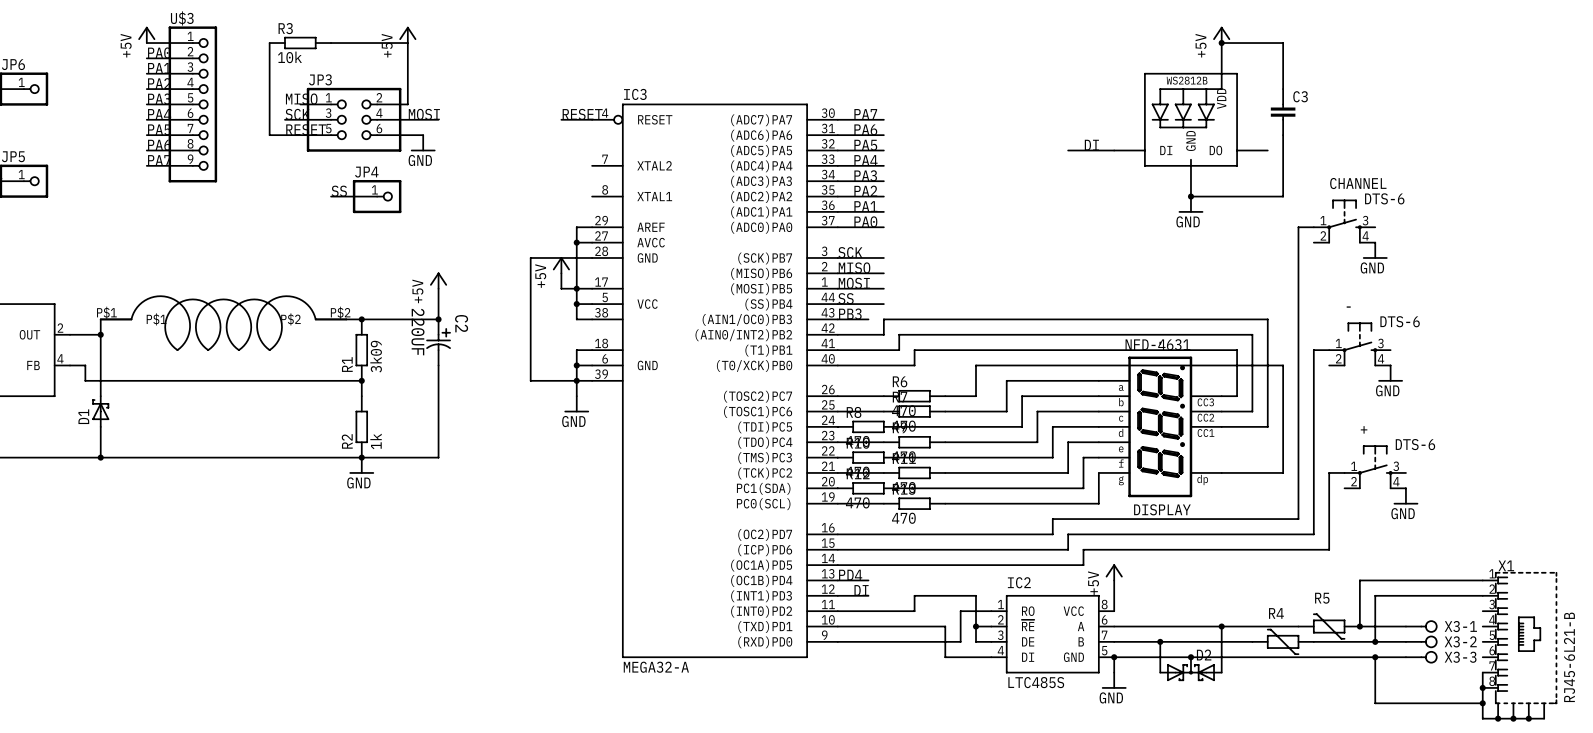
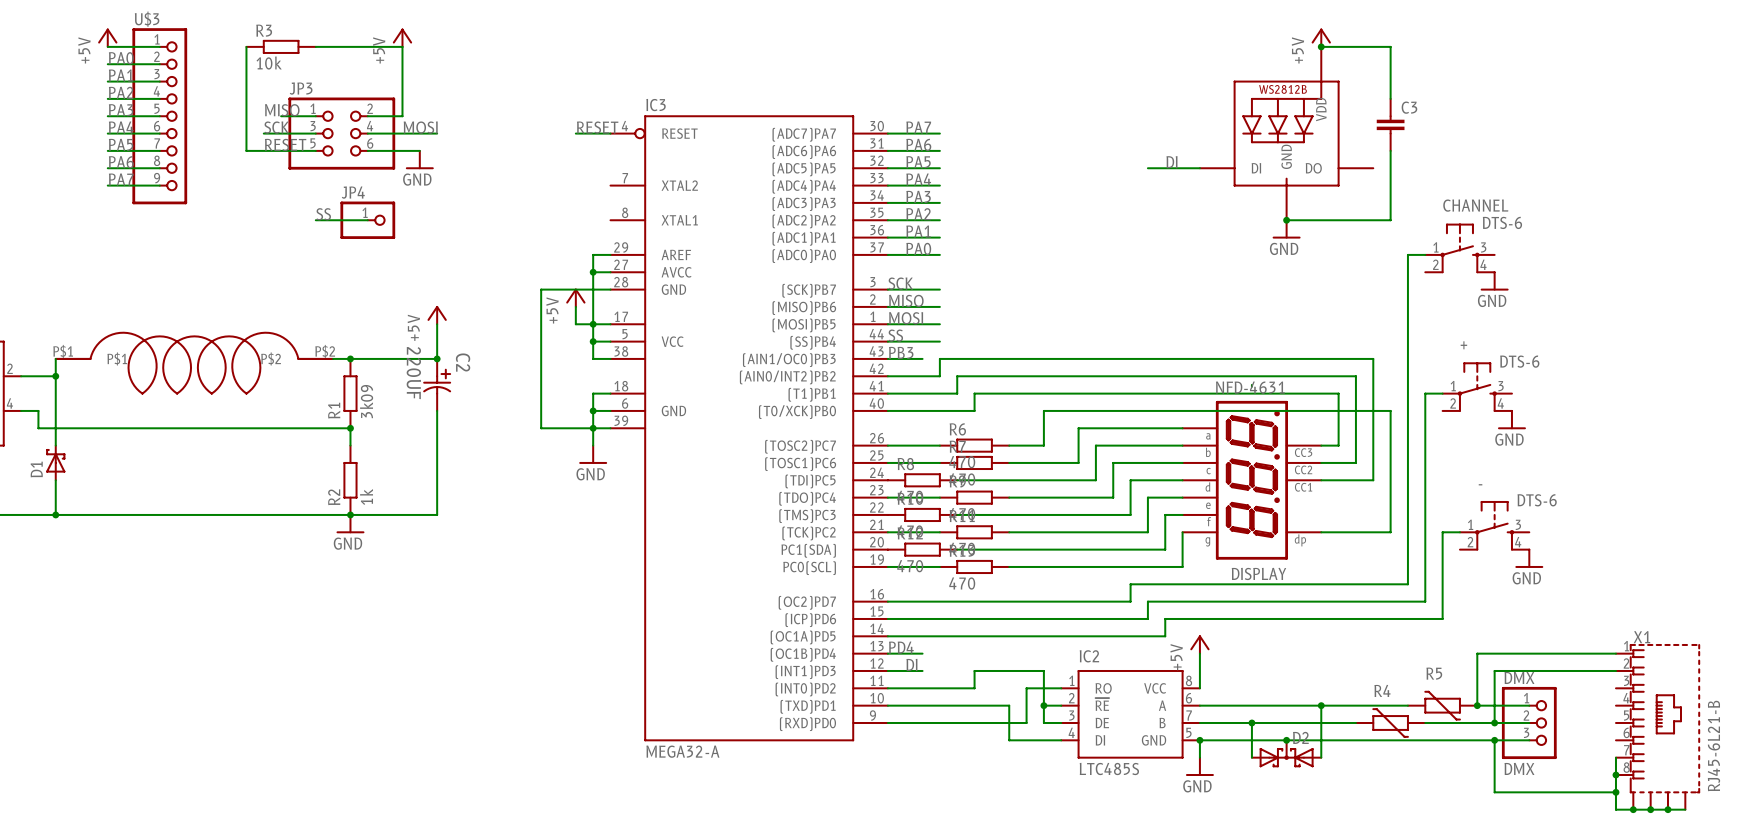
part name: - (1348, 307) -> + (1463, 345)
part name: + (1364, 429) -> - (1480, 484)
X3-1: (1421, 626) -> none
DMX: none -> DMX (1529, 722)
X3-2: (1421, 641) -> none
X3-3: (1421, 657) -> none

